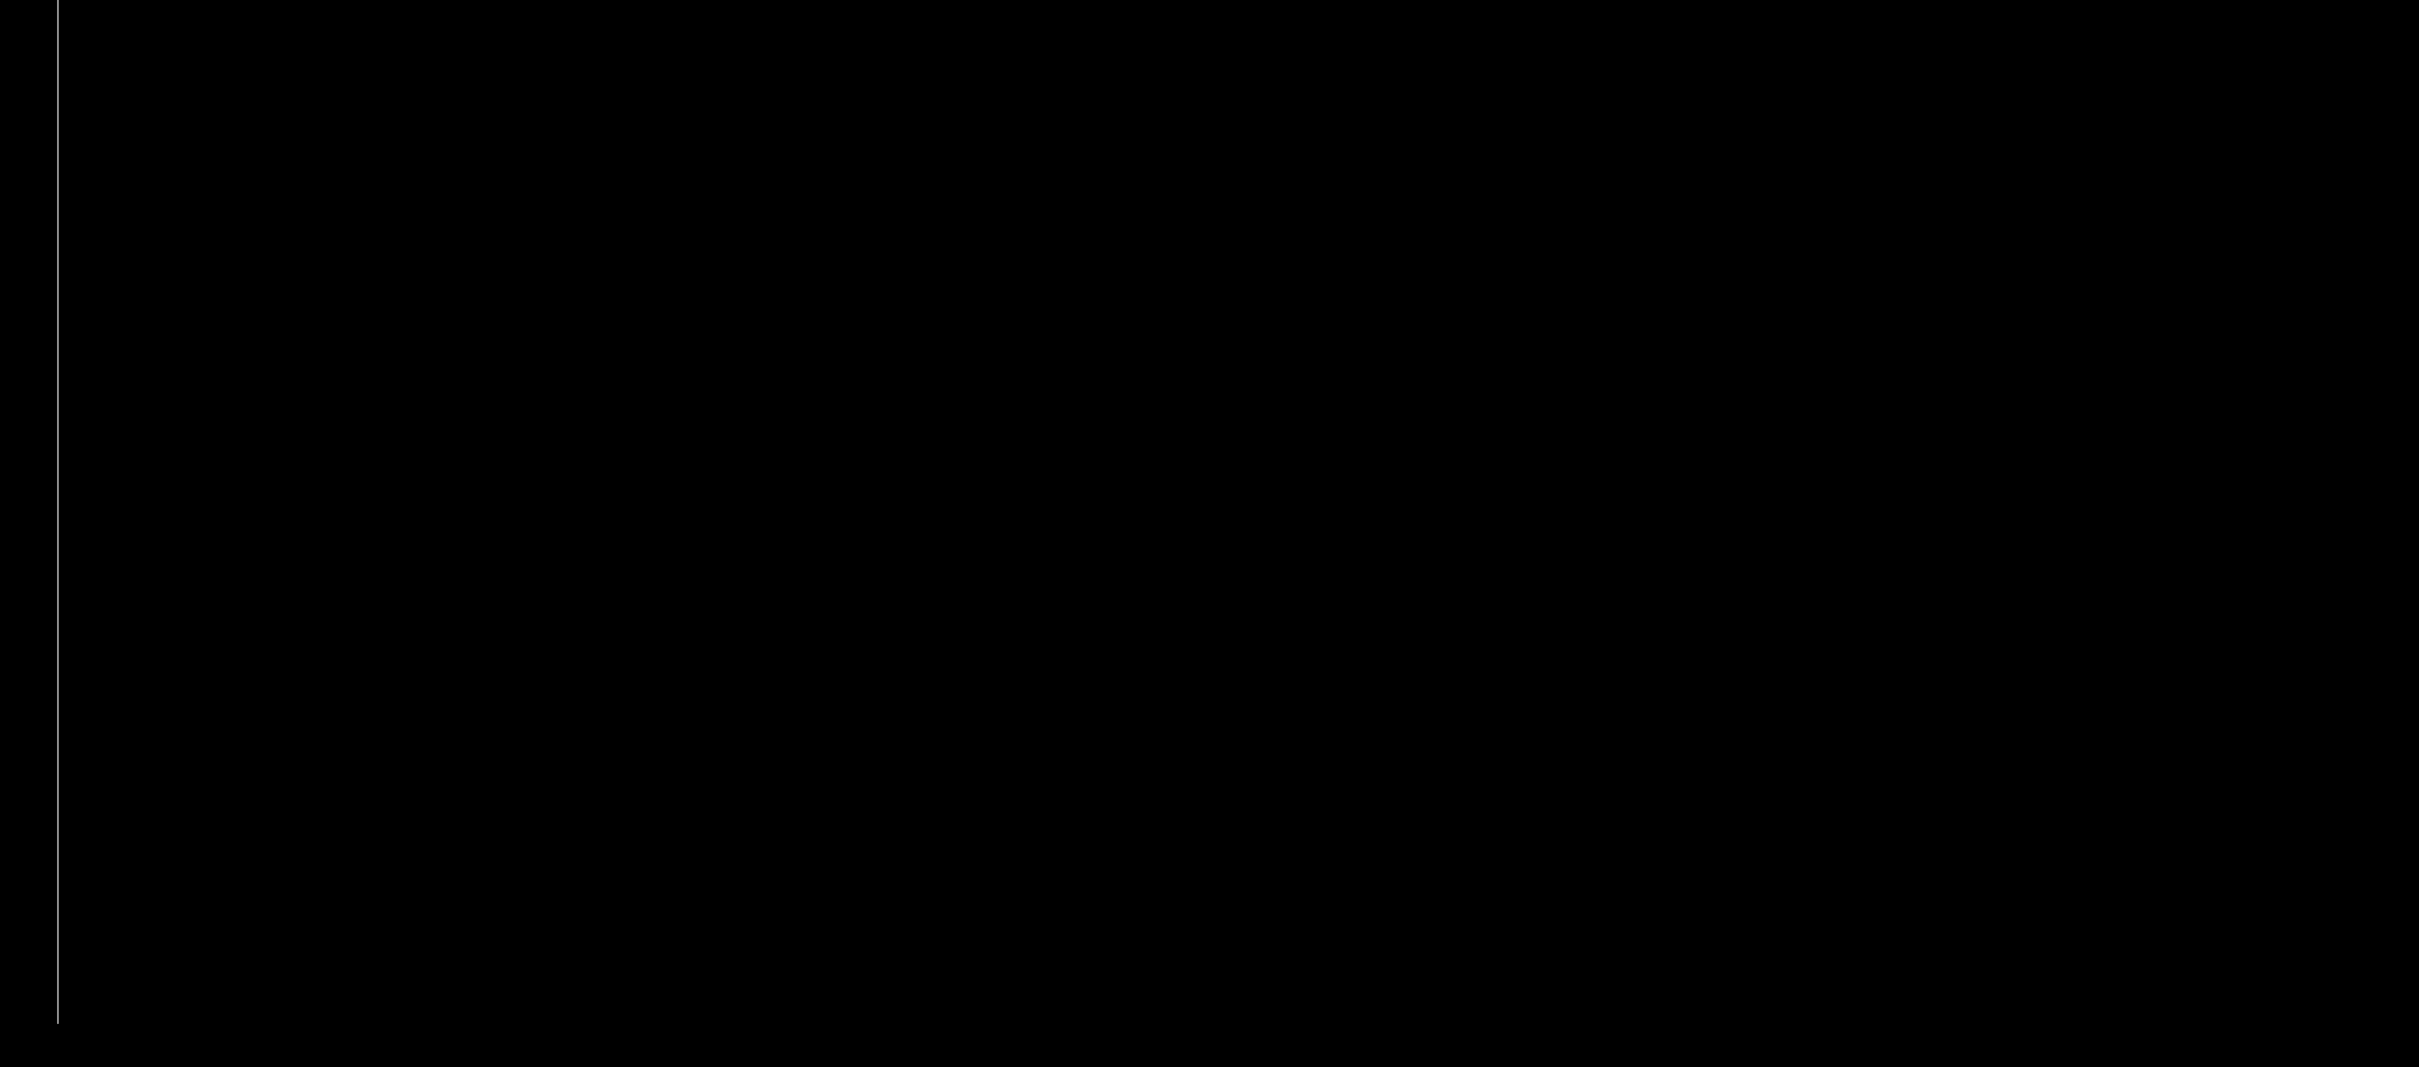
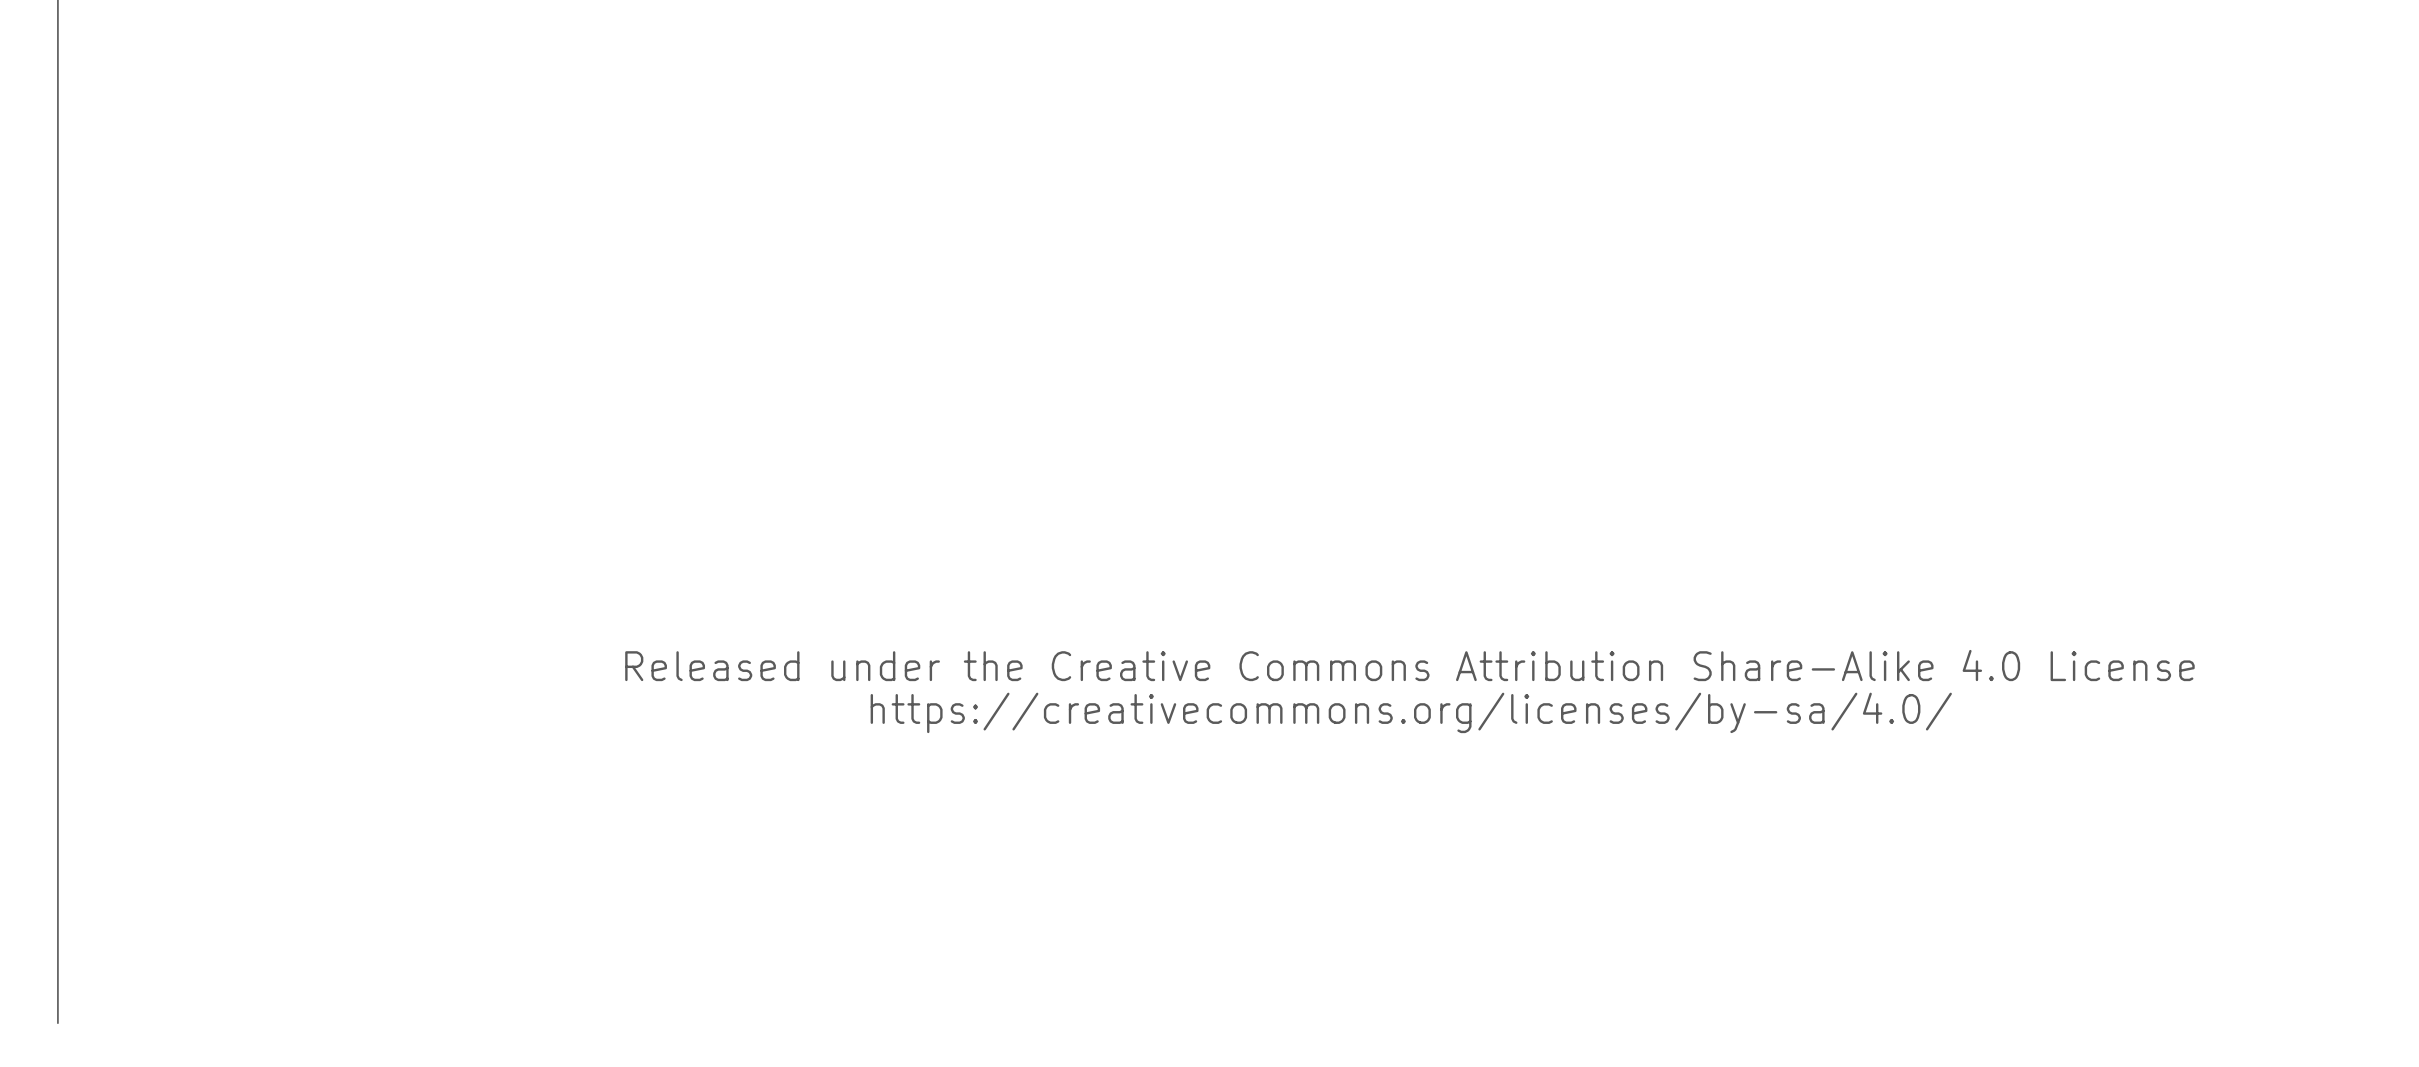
drawing: none -> [625, 649, 2195, 734]

